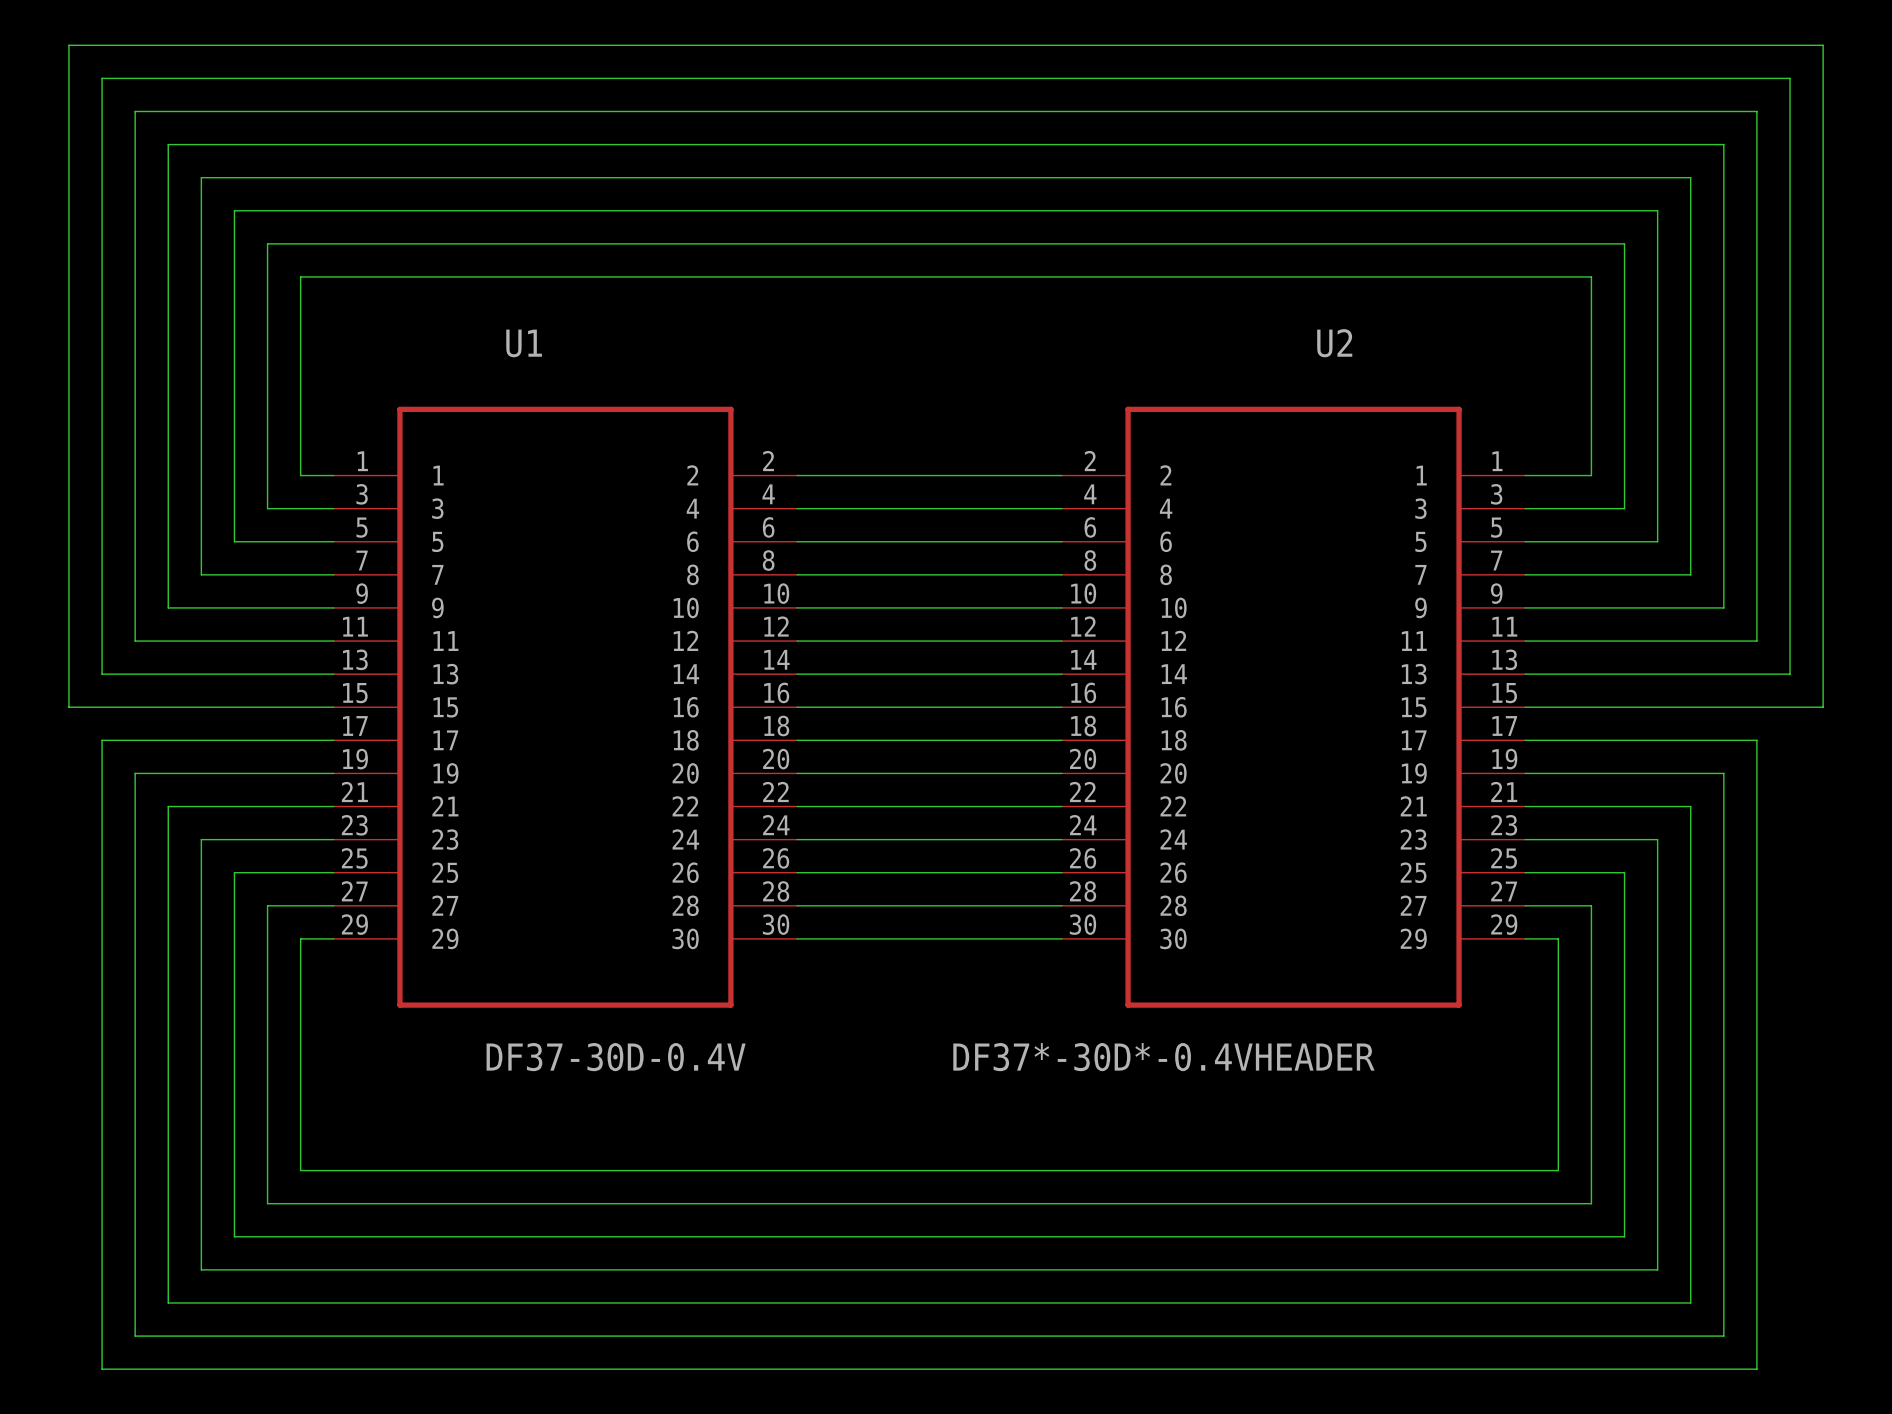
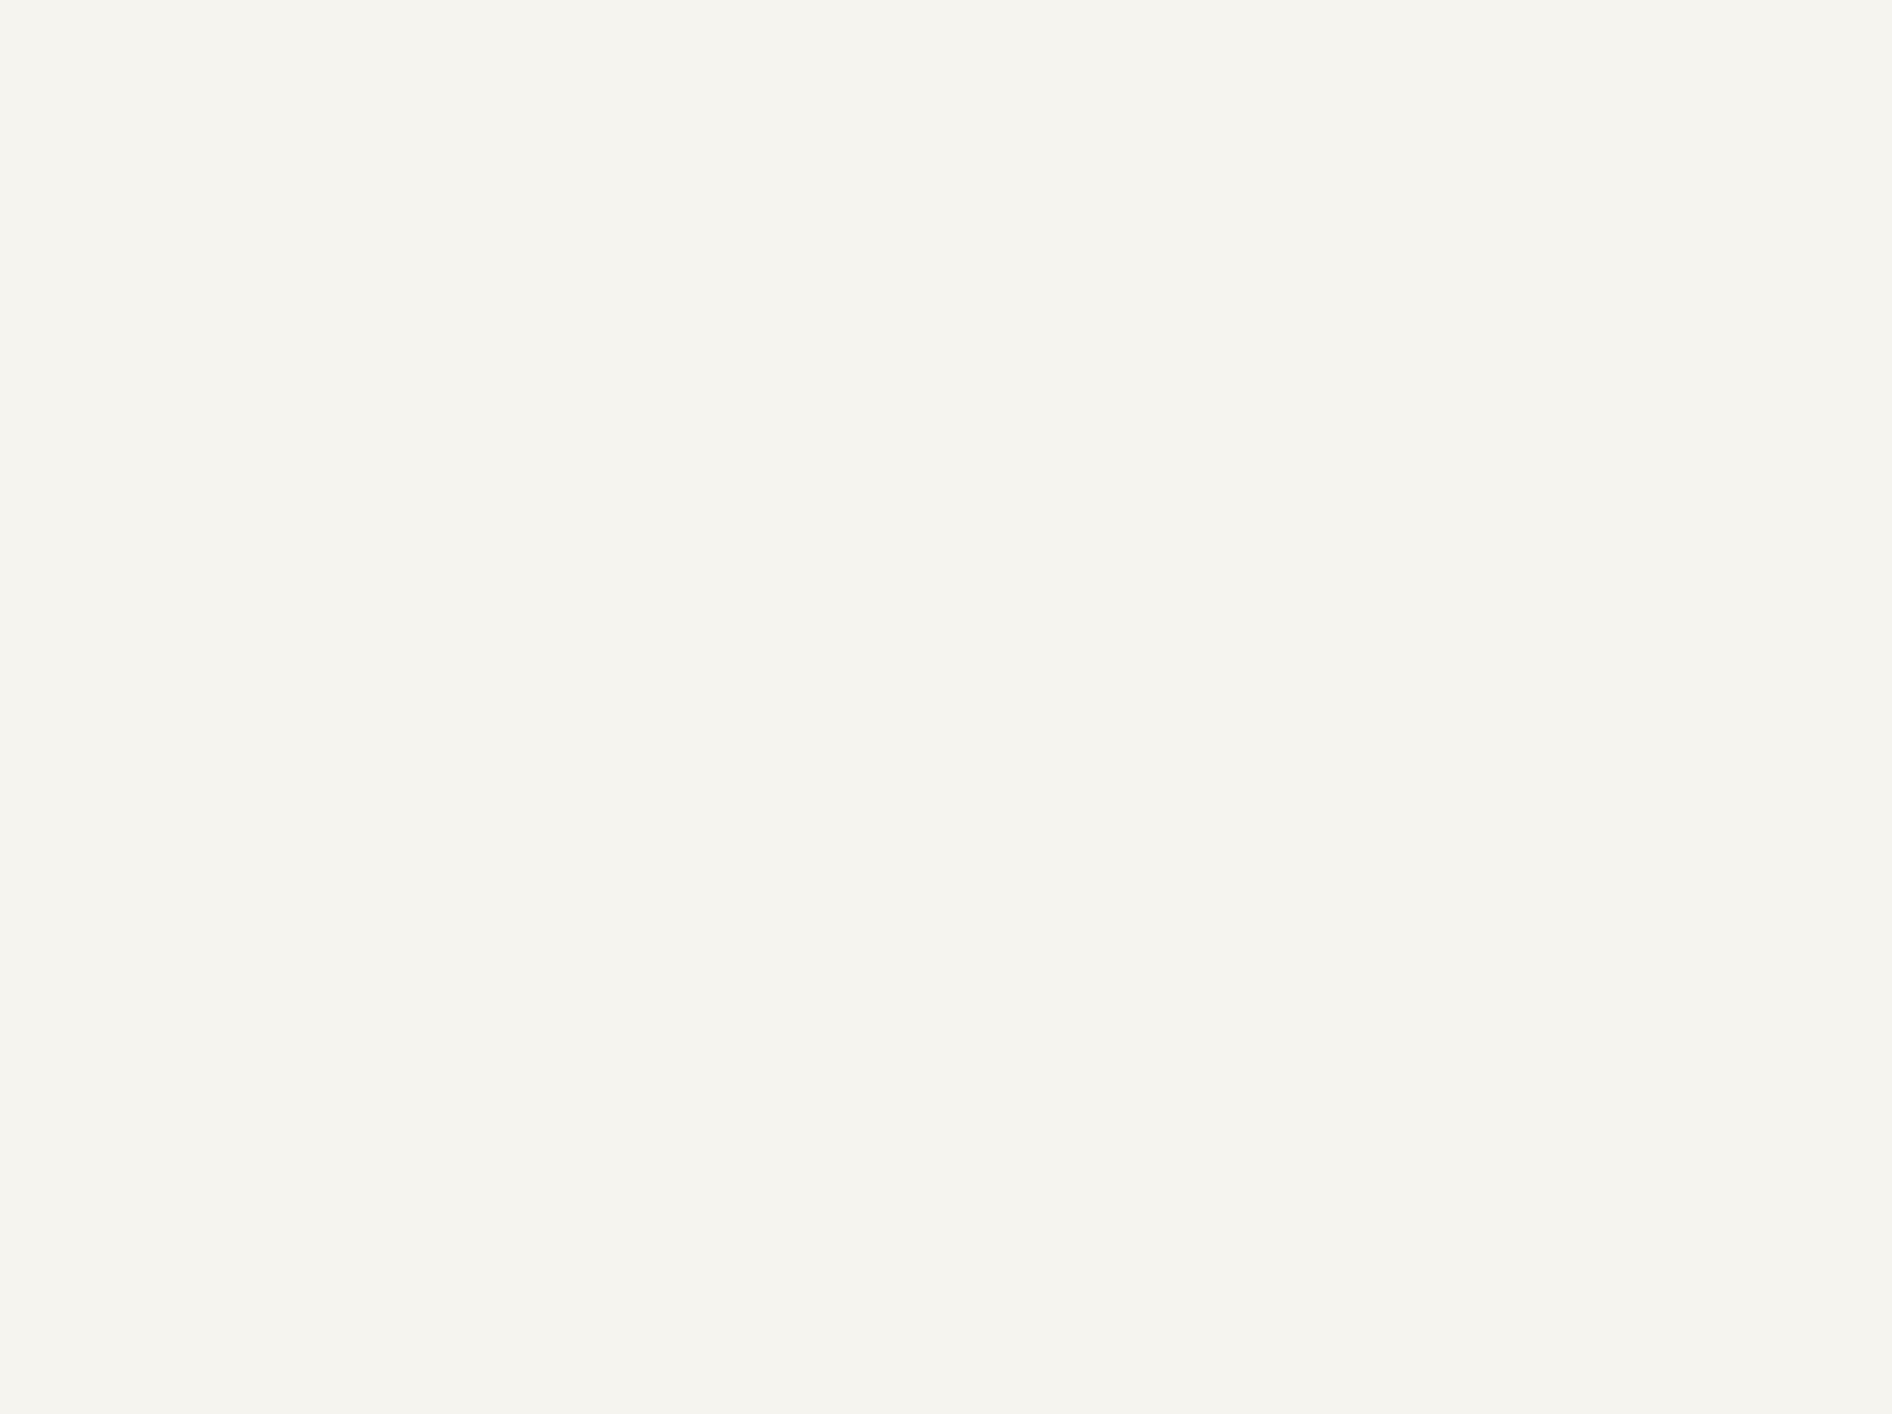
wire: (333, 475) (300, 475) (300, 276) (1591, 276) (1591, 475) (1525, 475) -> none
wire: (797, 475) (1061, 475) -> none
wire: (333, 508) (267, 508) (267, 243) (1624, 243) (1624, 508) (1525, 508) -> none
wire: (797, 508) (1061, 508) -> none
wire: (333, 541) (234, 541) (234, 210) (1657, 210) (1657, 541) (1525, 541) -> none
wire: (797, 541) (1061, 541) -> none
wire: (333, 574) (201, 574) (201, 177) (1690, 177) (1690, 574) (1525, 574) -> none
wire: (797, 574) (1061, 574) -> none
wire: (333, 607) (168, 607) (168, 144) (1723, 144) (1723, 607) (1525, 607) -> none
wire: (797, 607) (1061, 607) -> none
wire: (333, 641) (135, 641) (135, 111) (1756, 111) (1756, 641) (1525, 641) -> none
wire: (797, 641) (1061, 641) -> none
wire: (333, 674) (102, 674) (102, 78) (1790, 78) (1790, 674) (1525, 674) -> none
wire: (797, 674) (1061, 674) -> none
wire: (333, 707) (68, 707) (68, 45) (1823, 45) (1823, 707) (1525, 707) -> none
U1: DF37-30D-0.4V (565, 707) -> none
wire: (797, 707) (1061, 707) -> none
U2: DF37*-30D*-0.4VHEADER (1293, 707) -> none
wire: (333, 740) (102, 740) (102, 1369) (1756, 1369) (1756, 740) (1525, 740) -> none
wire: (797, 740) (1061, 740) -> none
wire: (333, 773) (135, 773) (135, 1336) (1723, 1336) (1723, 773) (1525, 773) -> none
wire: (797, 773) (1061, 773) -> none
wire: (333, 806) (168, 806) (168, 1302) (1690, 1302) (1690, 806) (1525, 806) -> none
wire: (797, 806) (1061, 806) -> none
wire: (333, 839) (201, 839) (201, 1269) (1657, 1269) (1657, 839) (1525, 839) -> none
wire: (797, 839) (1061, 839) -> none
wire: (333, 872) (234, 872) (234, 1236) (1624, 1236) (1624, 872) (1525, 872) -> none
wire: (797, 872) (1061, 872) -> none
wire: (333, 905) (267, 905) (267, 1203) (1591, 1203) (1591, 905) (1525, 905) -> none
wire: (797, 905) (1061, 905) -> none
wire: (333, 938) (300, 938) (300, 1170) (1558, 1170) (1558, 938) (1525, 938) -> none
wire: (797, 938) (1061, 938) -> none

